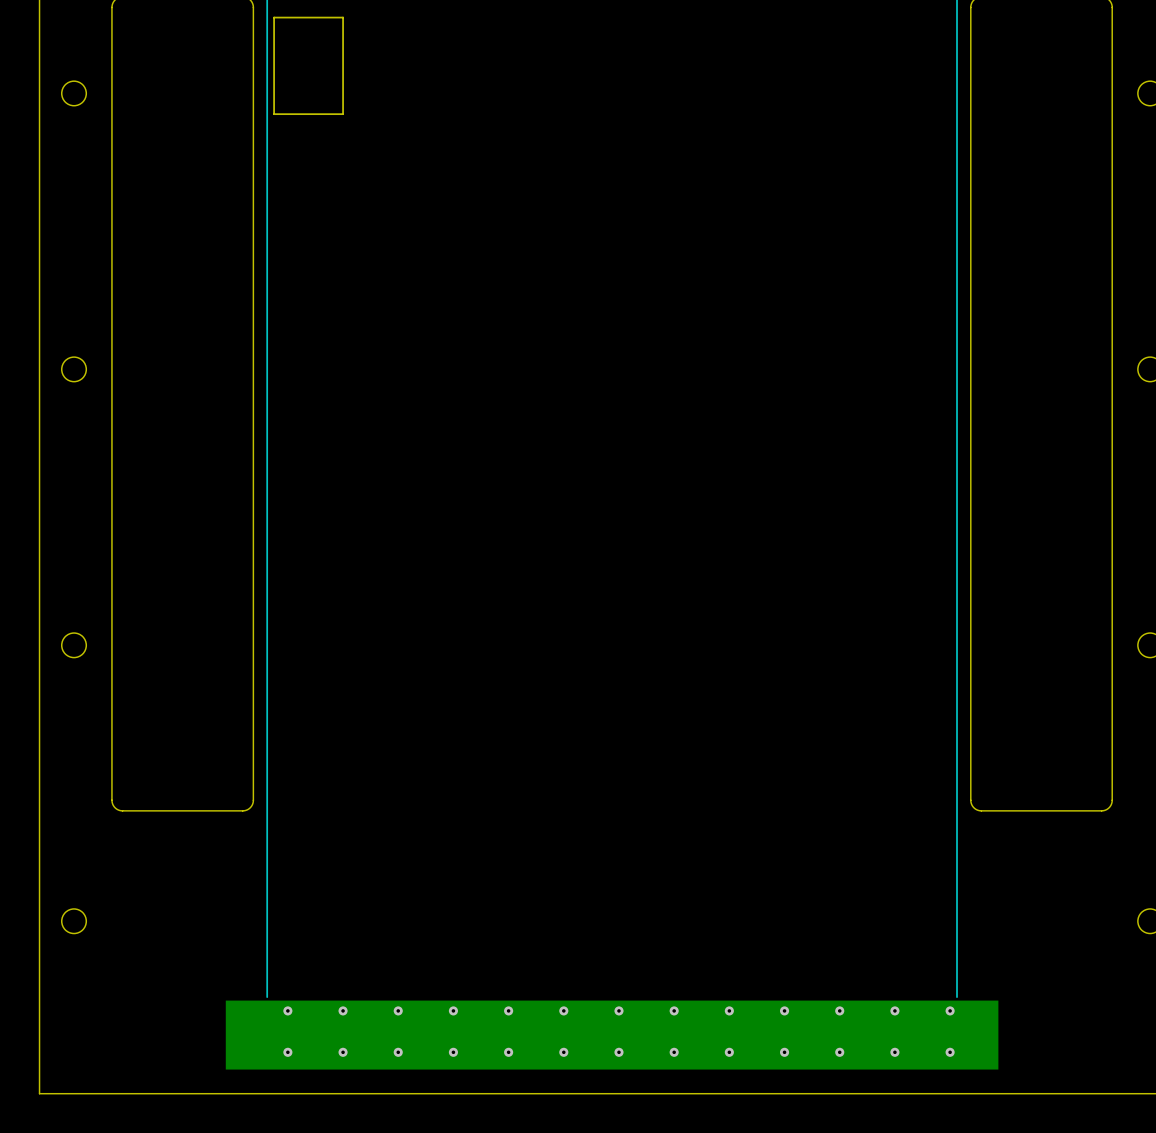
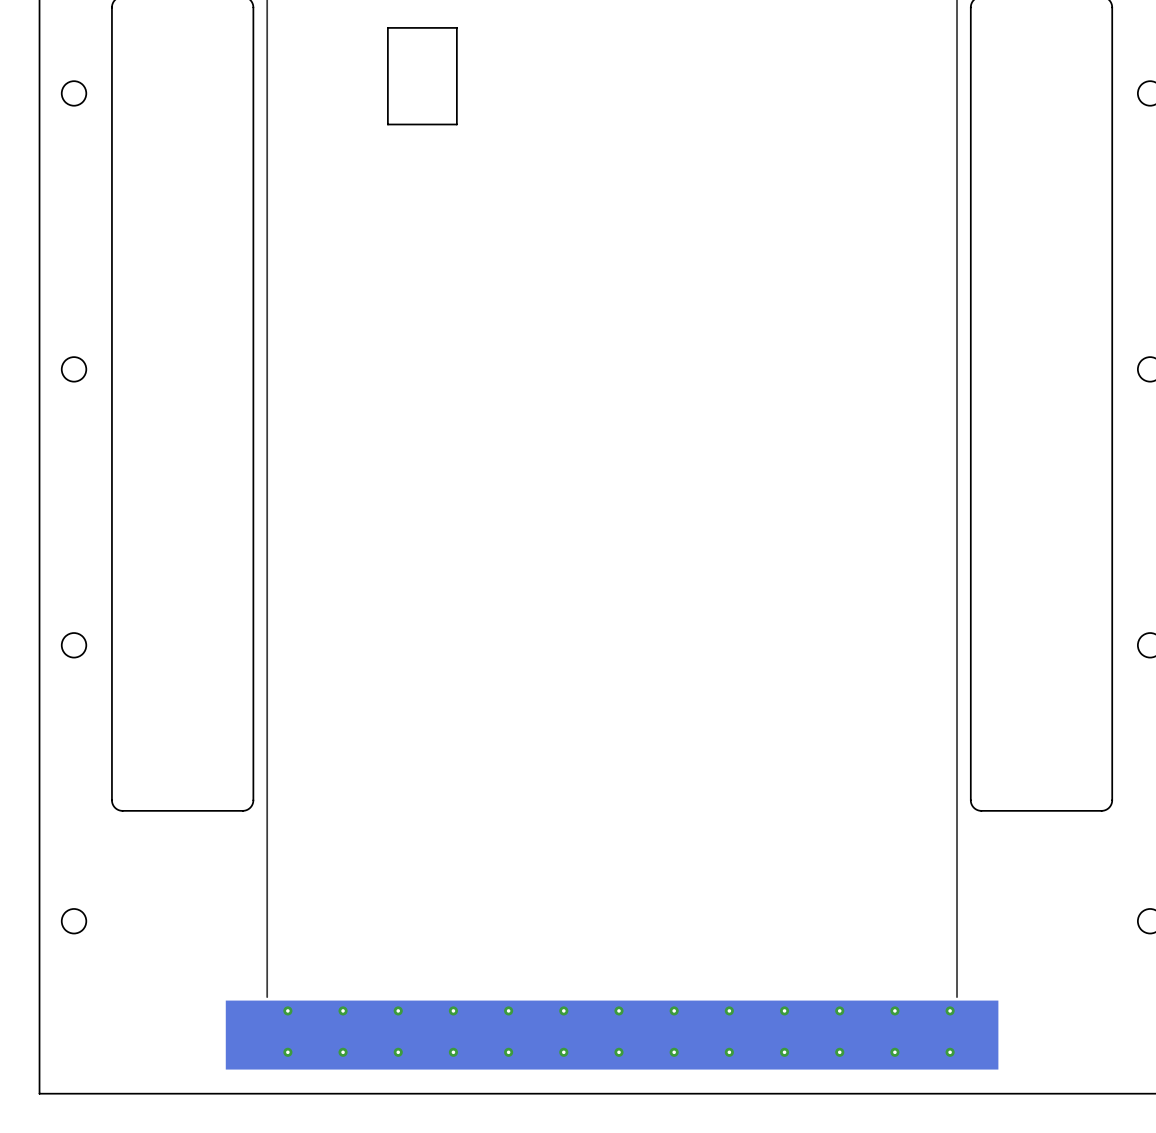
part position: (308, 65) -> (422, 76)

